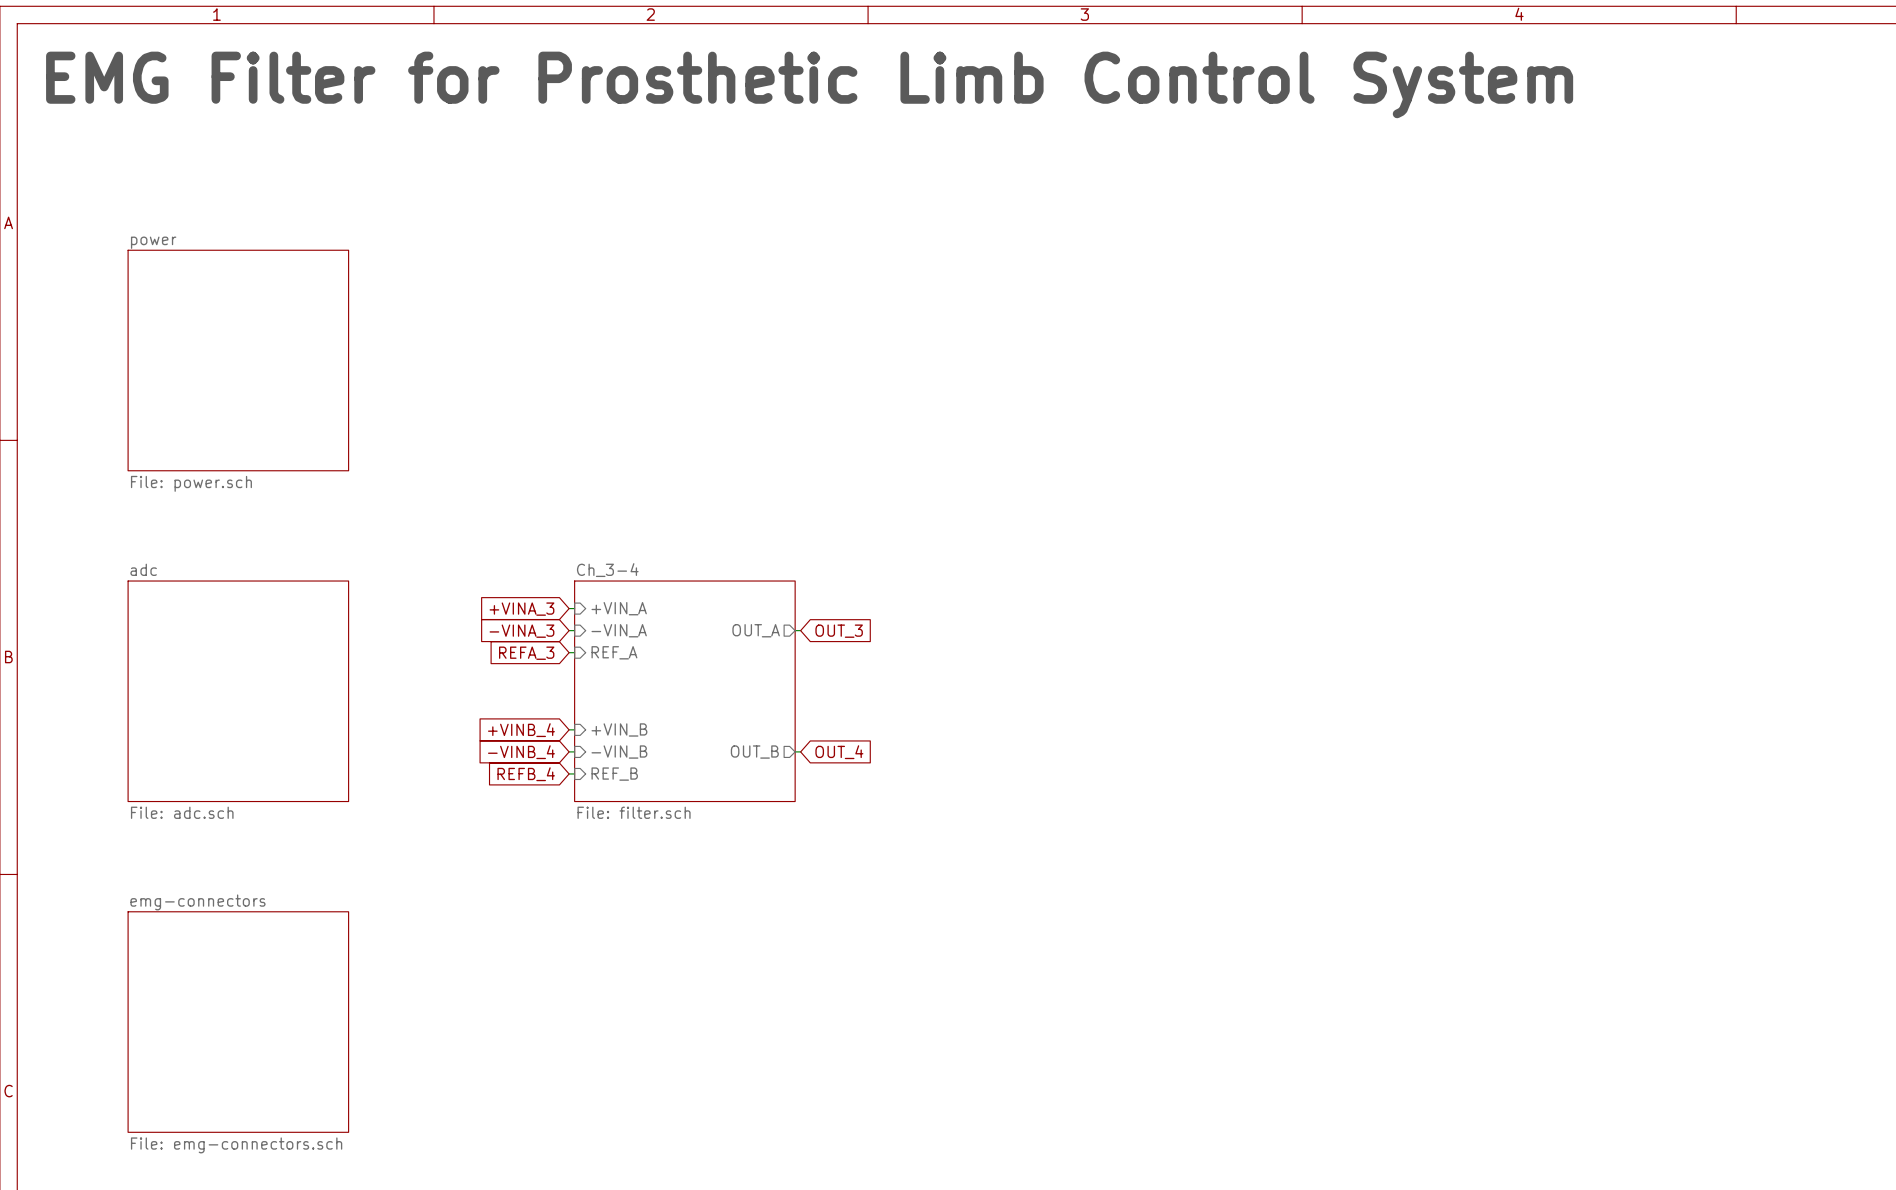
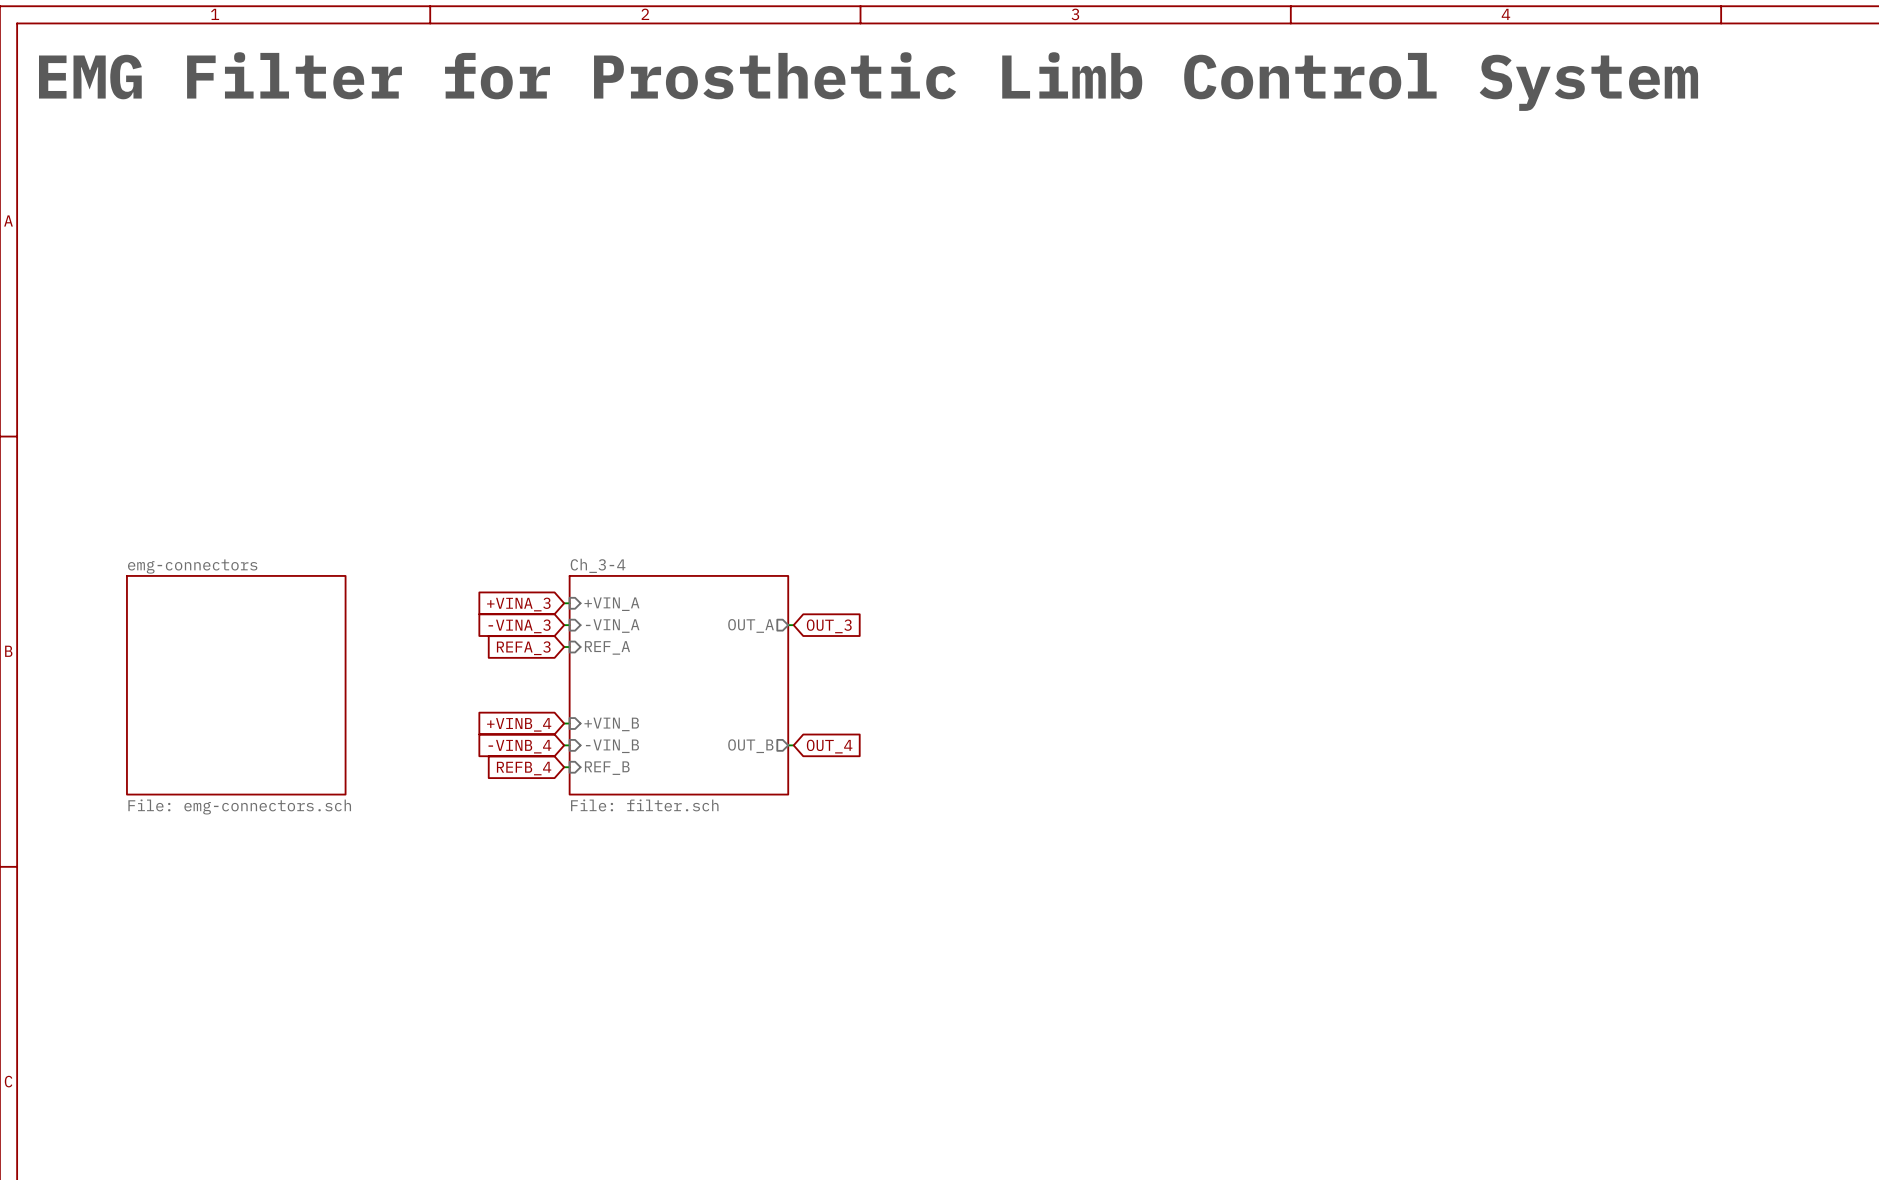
sheet power: File: power.sch (238, 360) -> none
sheet adc name: adc (143, 569) -> emg-connectors (192, 566)
sheet adc value: File: adc.sch (182, 812) -> File: emg-connectors.sch (239, 806)
sheet emg-connectors: File: emg-connectors.sch (238, 1022) -> none

